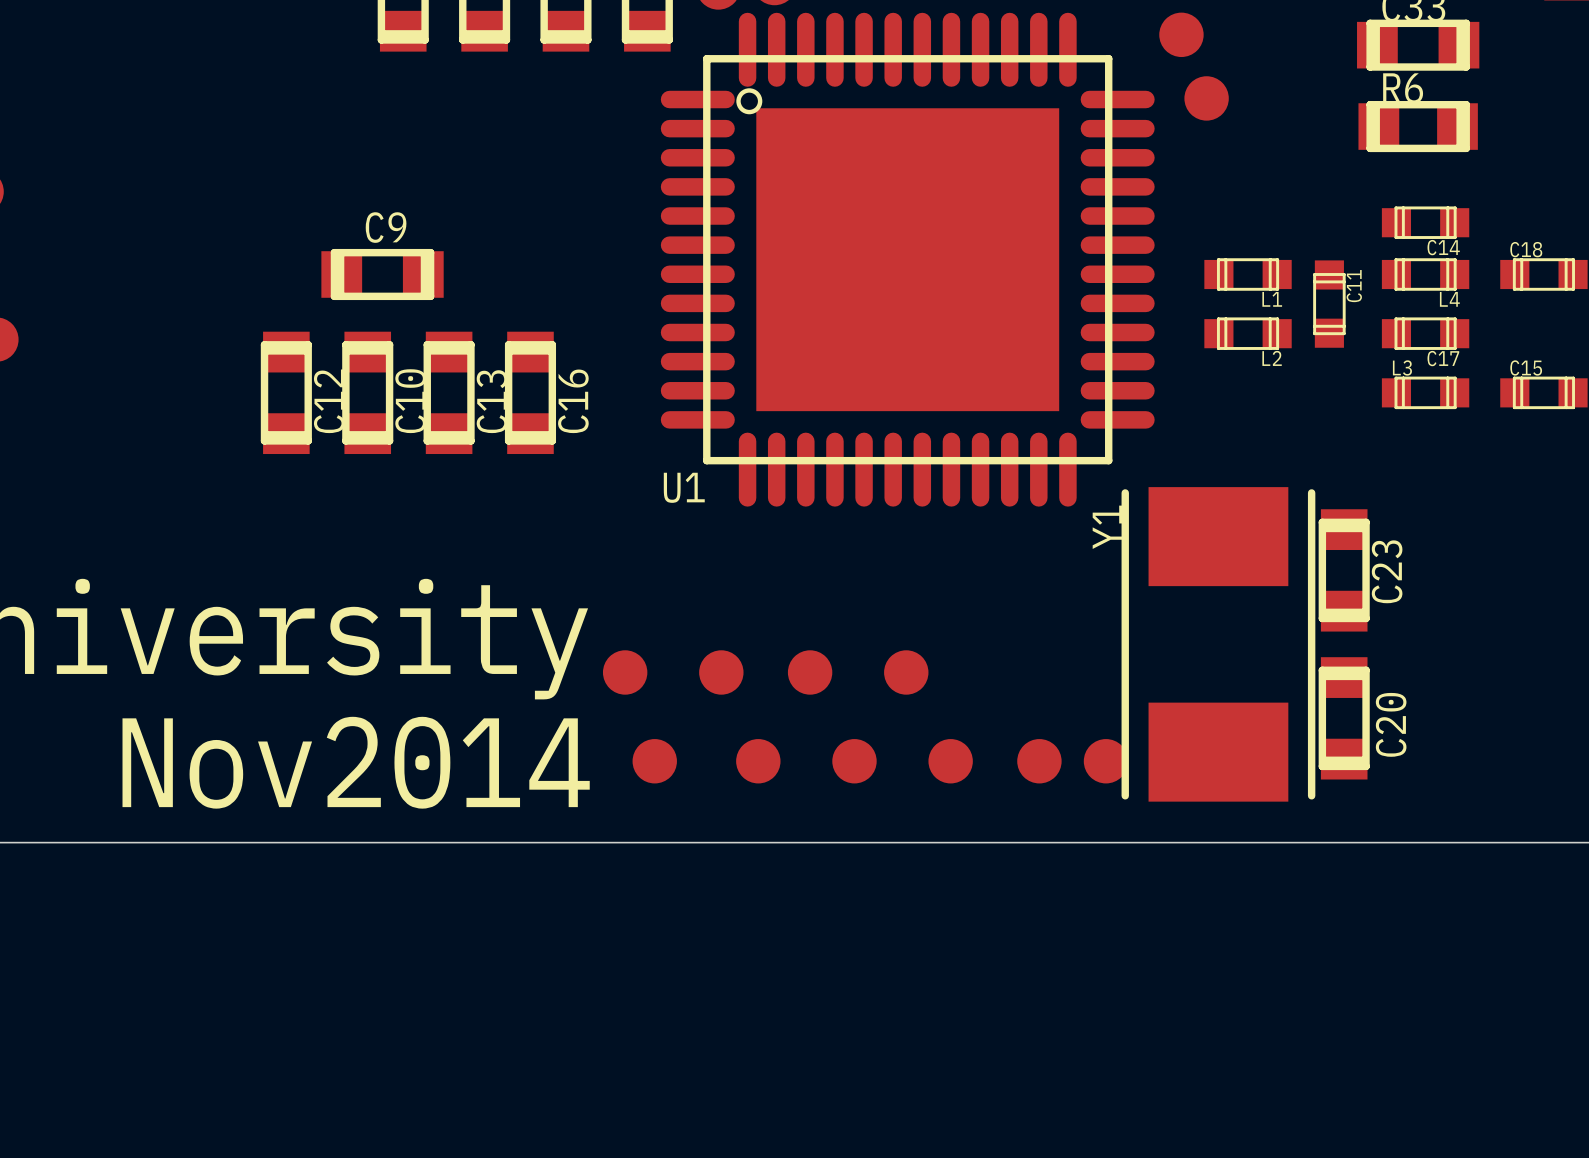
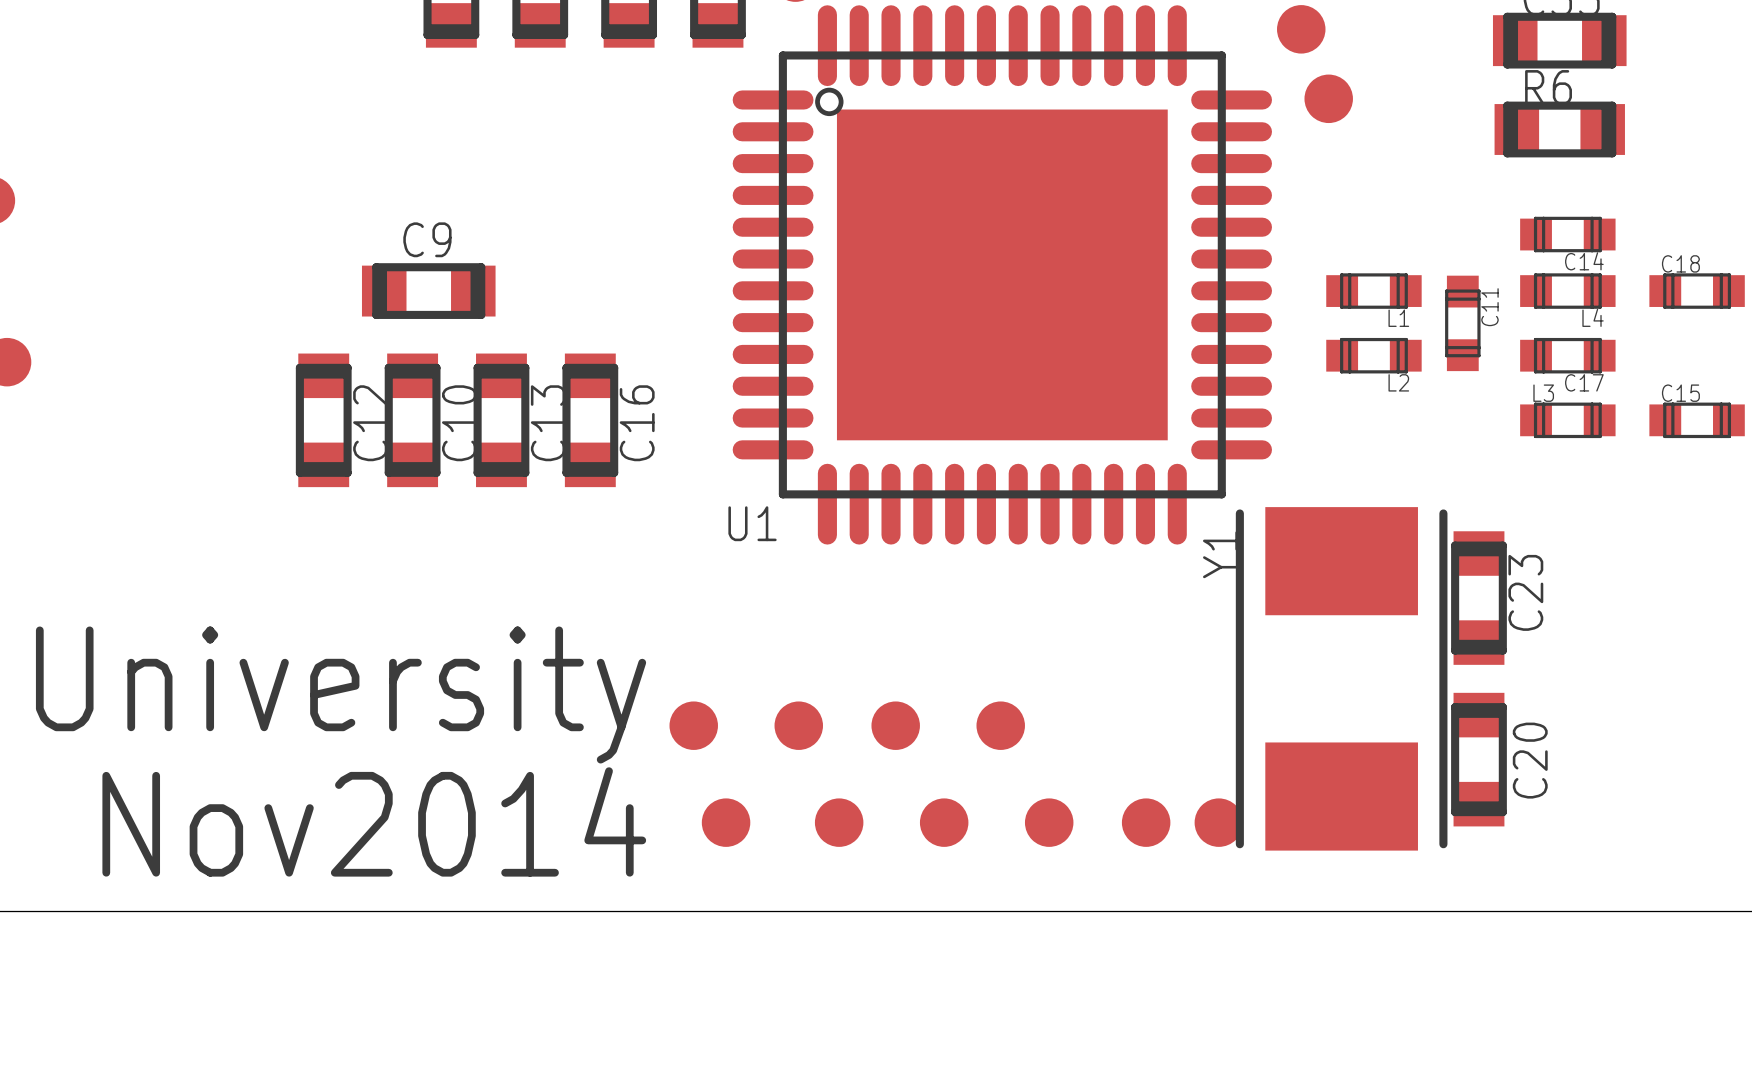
C23 position: (1344, 570) -> (1478, 598)
Y1 position: (1218, 644) -> (1341, 678)
C20 position: (1344, 718) -> (1478, 759)

